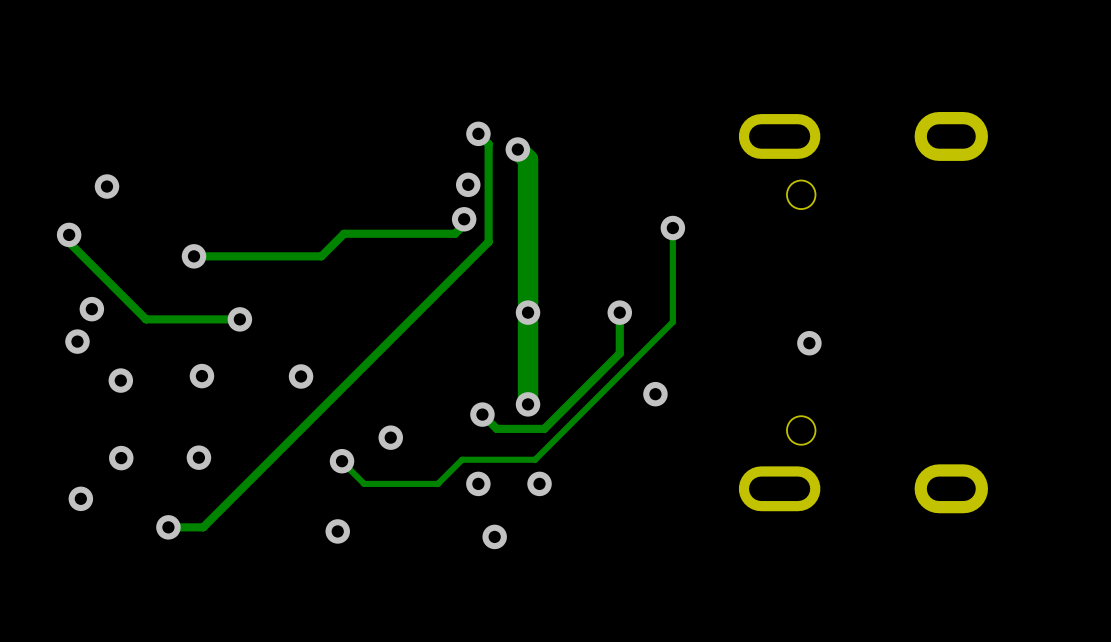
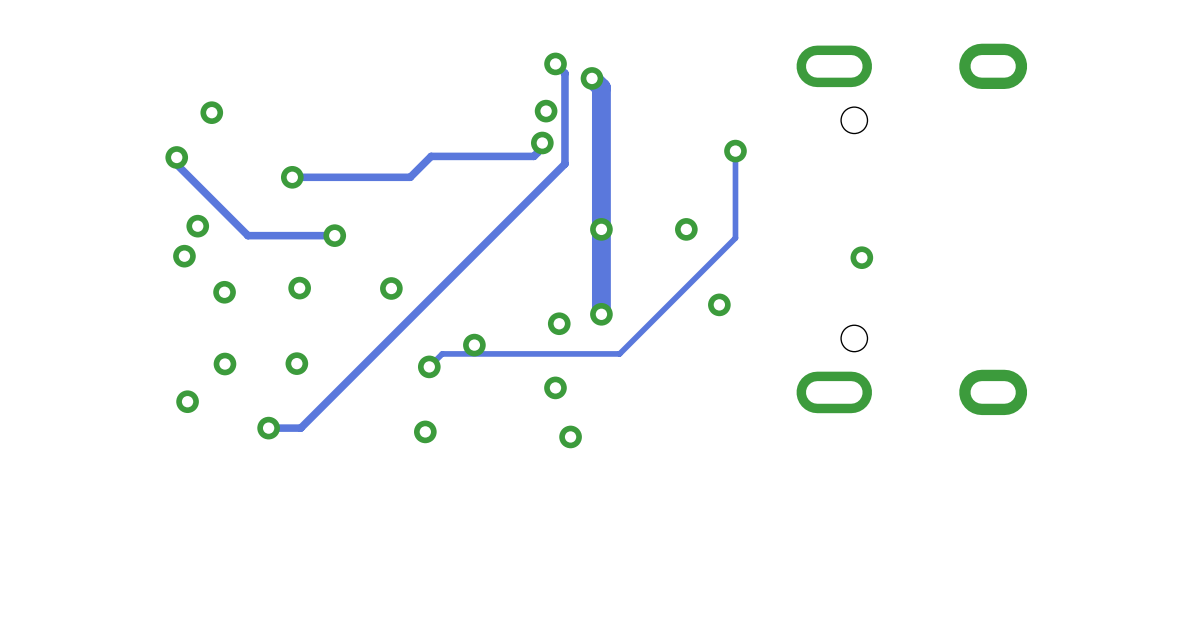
track: (619, 312) (619, 353) (544, 428) (496, 428) (482, 414) -> none
track: (547, 447) (535, 459) (462, 459) (437, 483) (364, 483) (342, 461) -> (619, 353) (442, 353) (429, 366)
via: (539, 483) -> none

